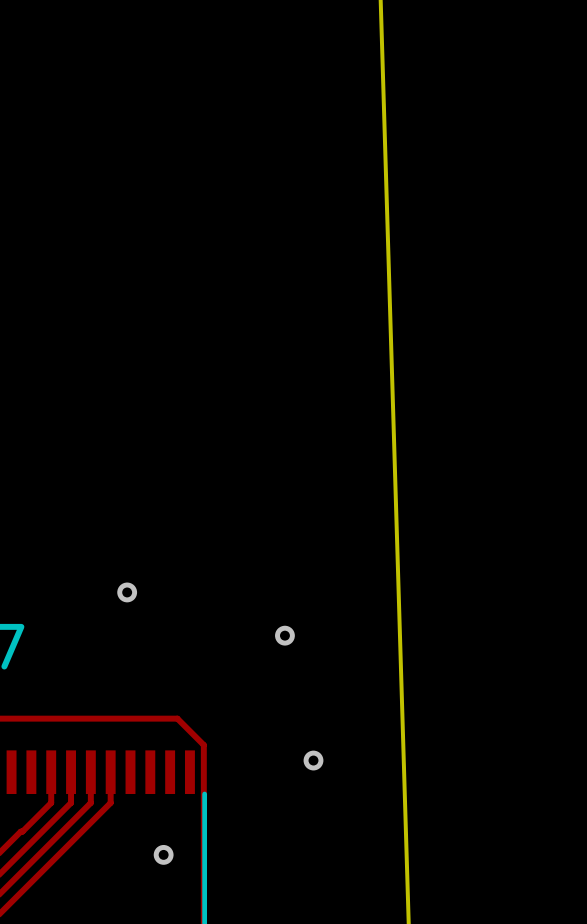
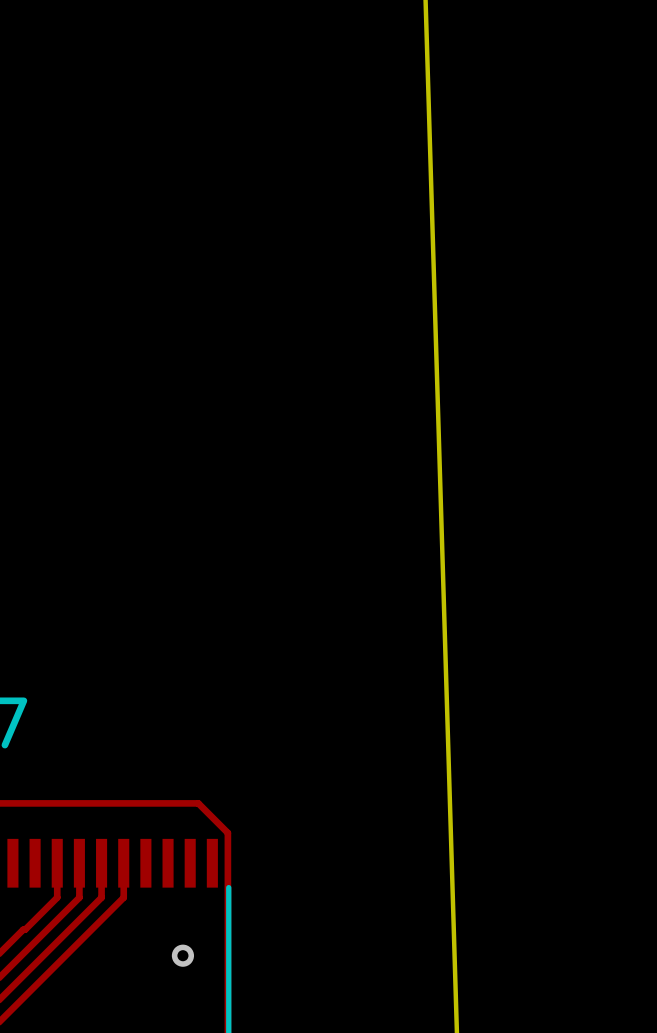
via: (127, 592) -> none
via: (284, 635) -> none
via: (313, 760) -> none

